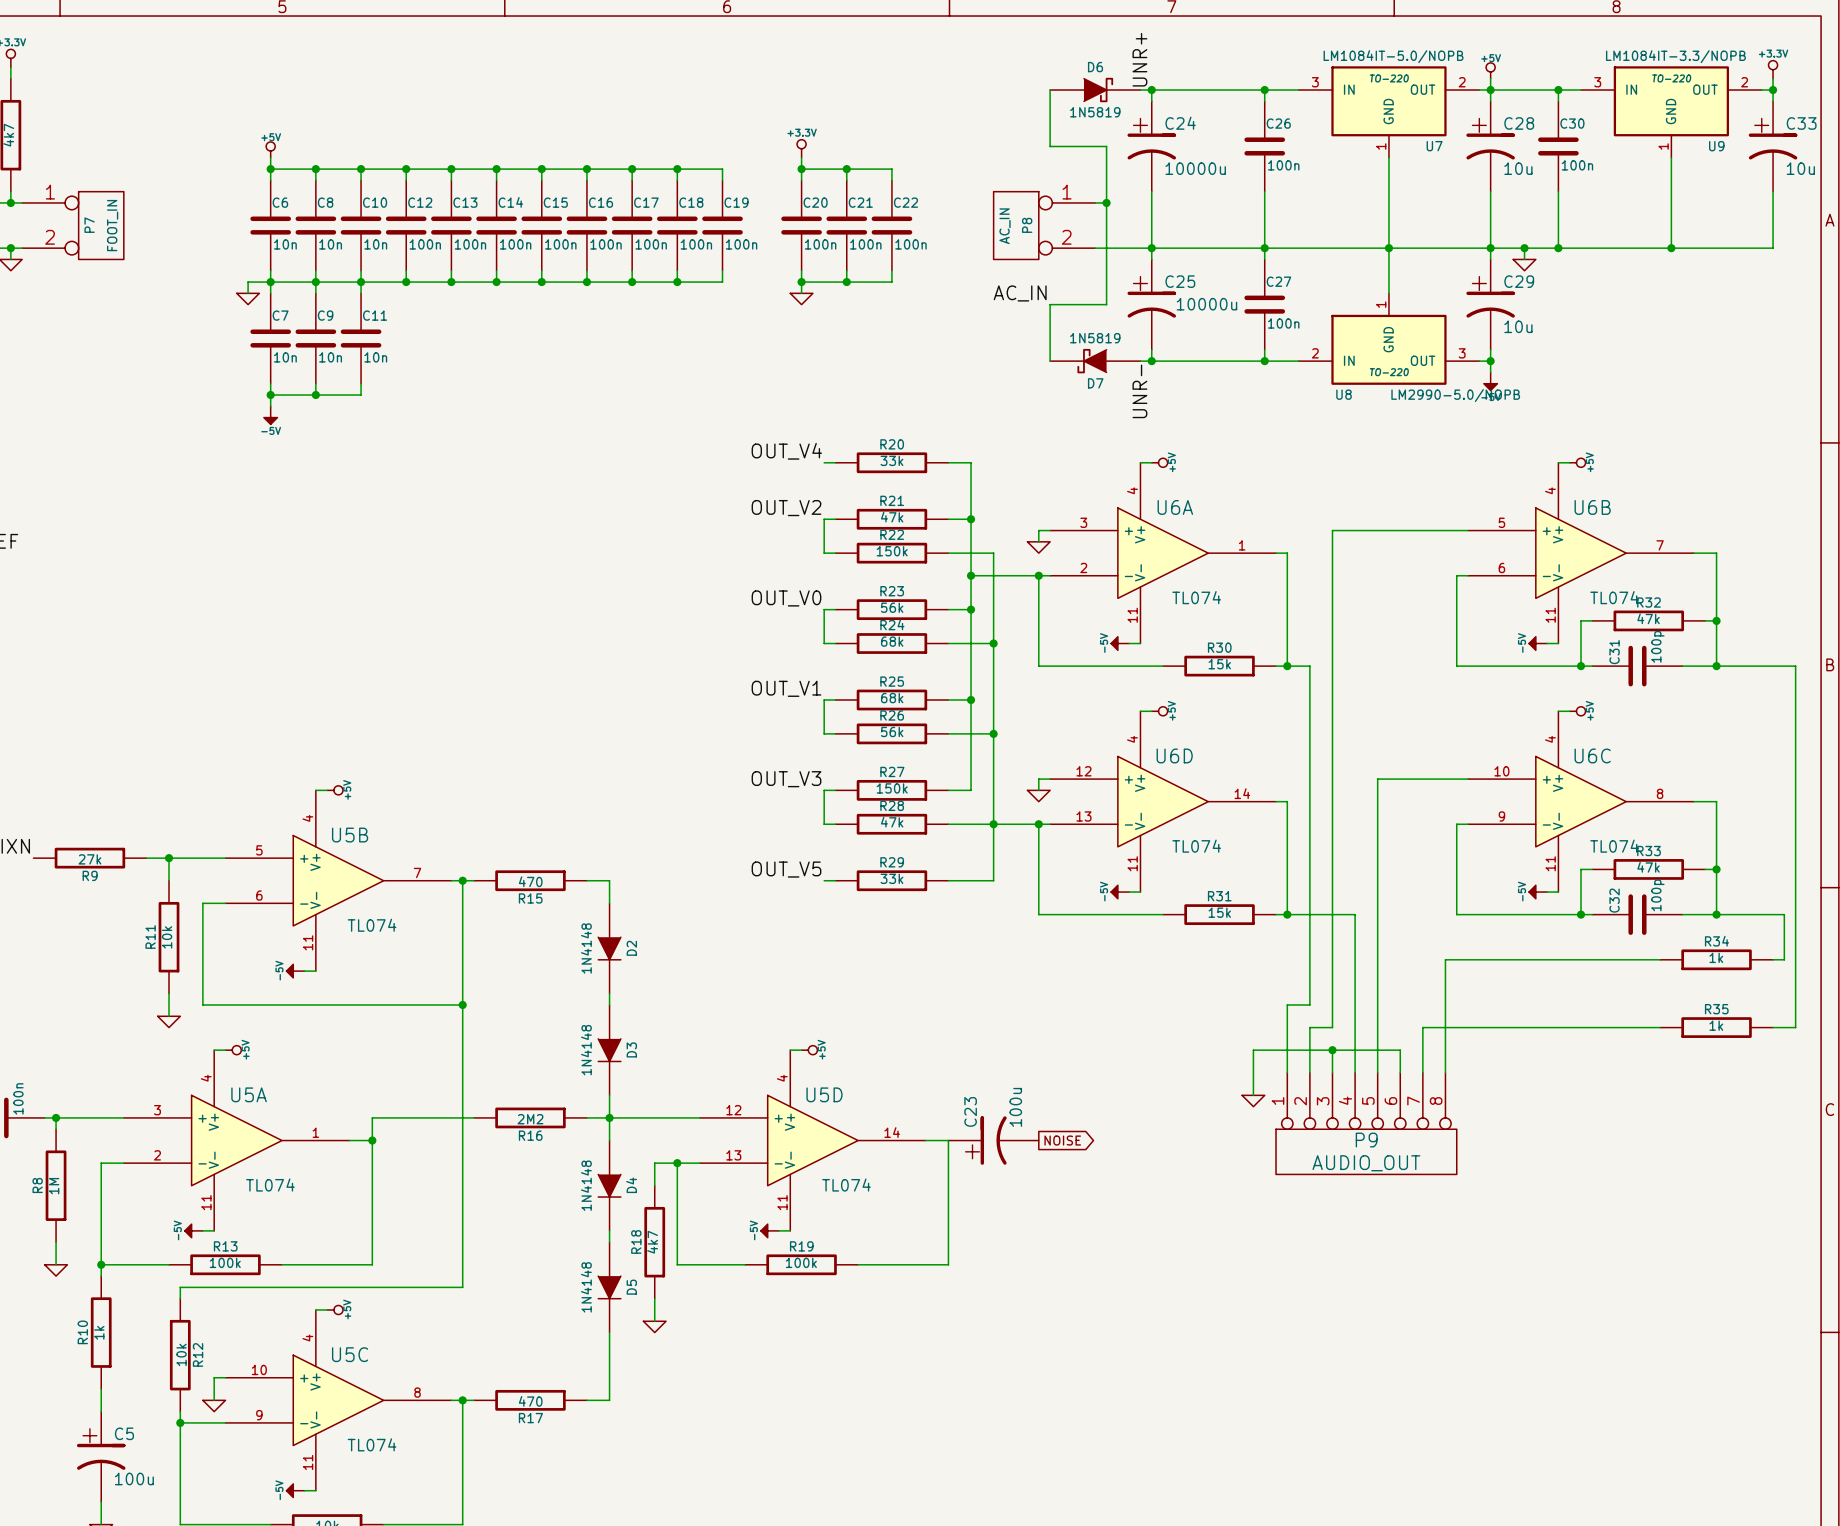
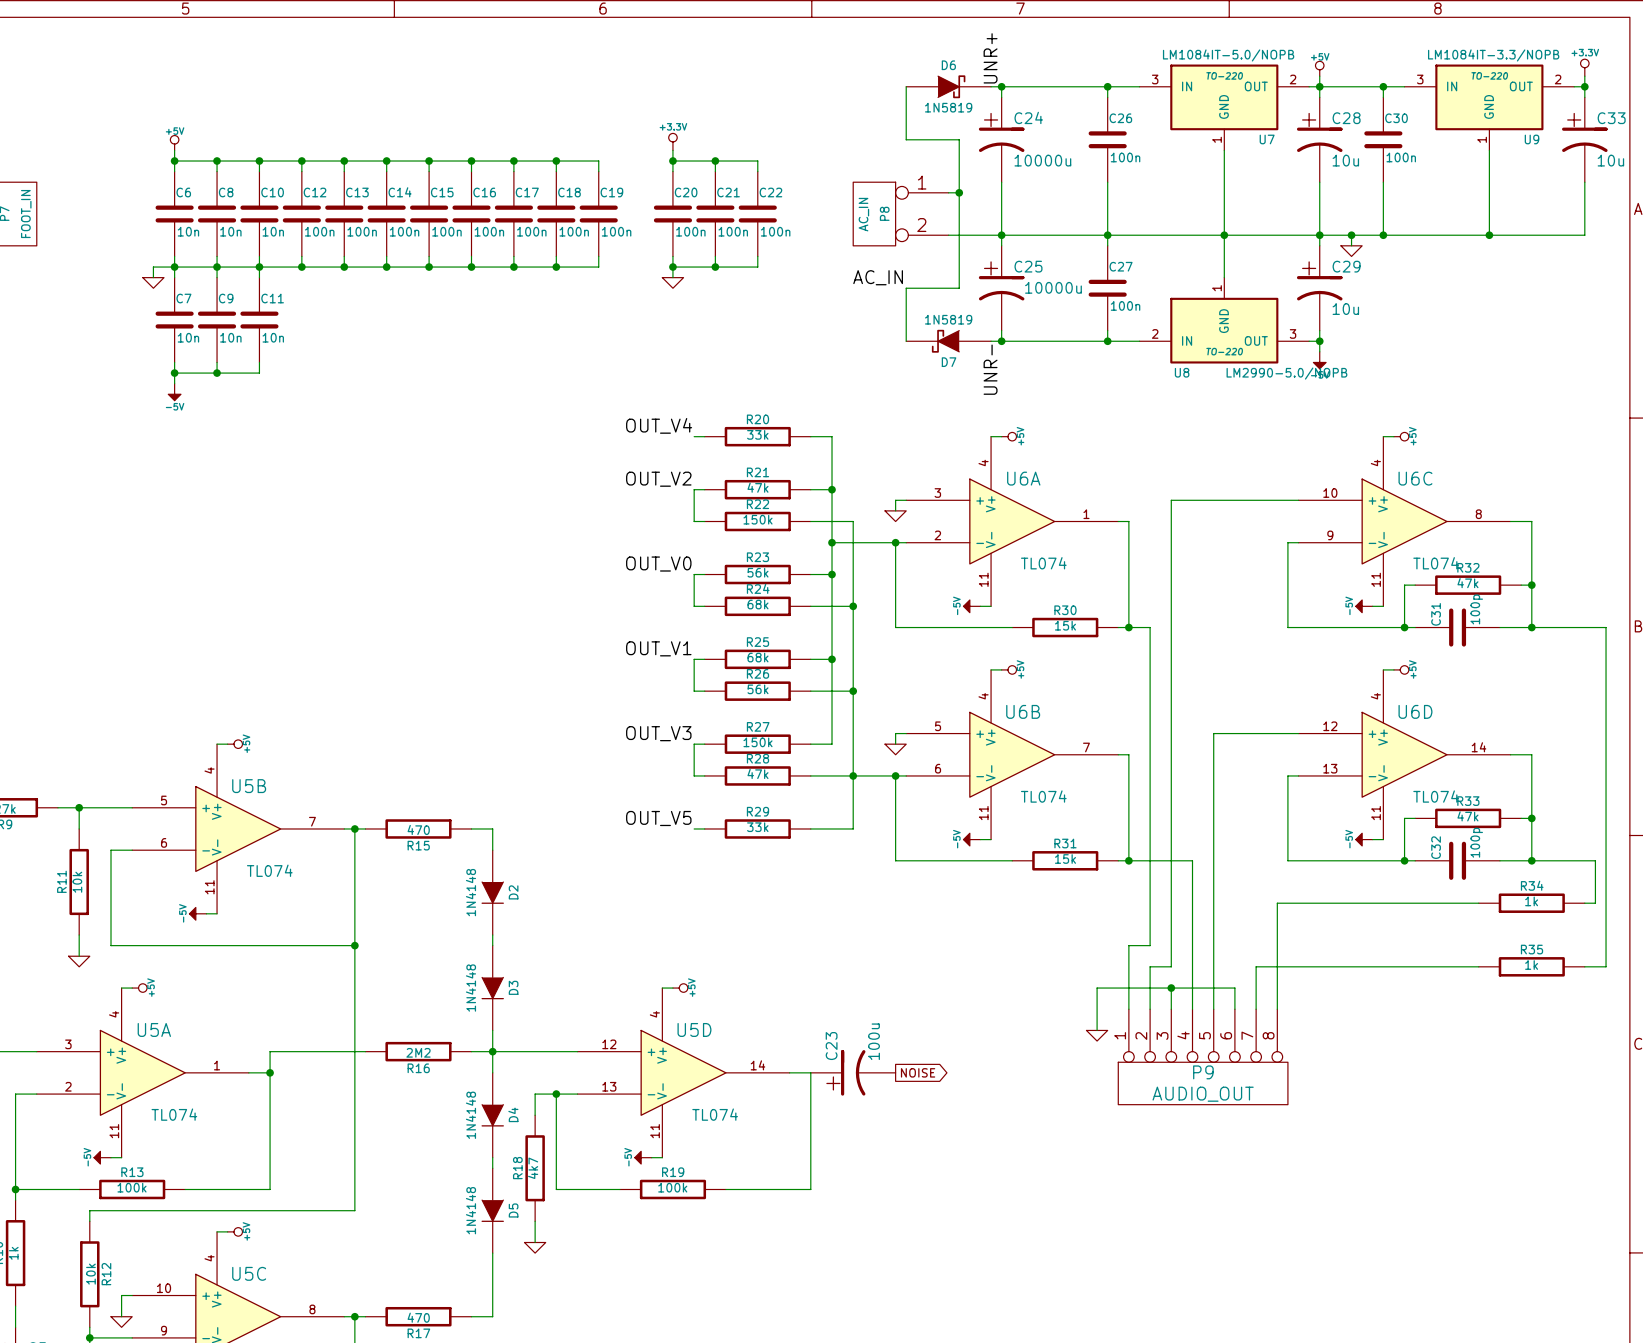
U6B position: (1581, 553) -> (1012, 754)
U6D position: (1163, 801) -> (1404, 754)
U6C position: (1581, 801) -> (1404, 521)

